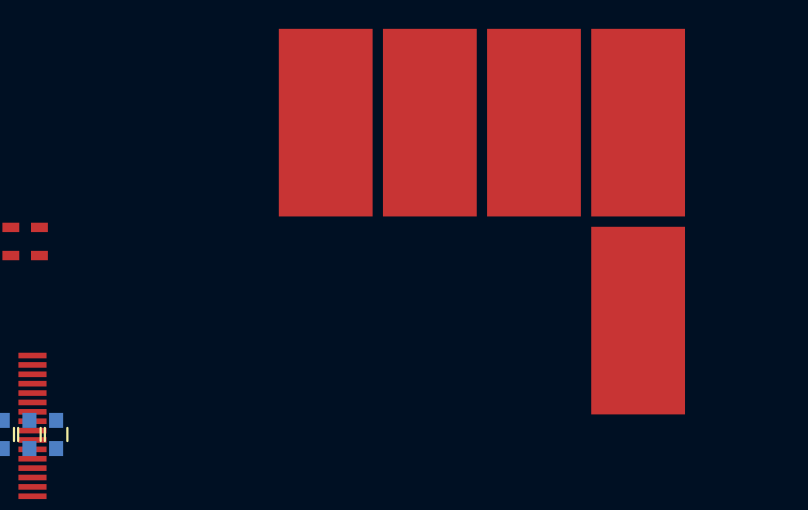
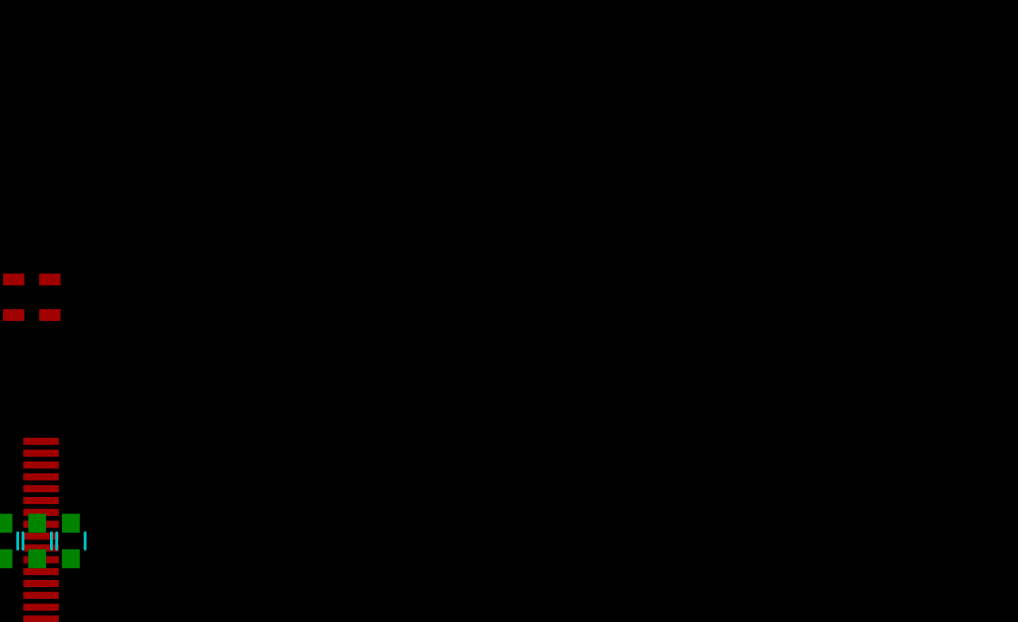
part: (325, 122) -> none
part: (429, 122) -> none
part: (533, 122) -> none
part: (638, 122) -> none
part: (638, 320) -> none

